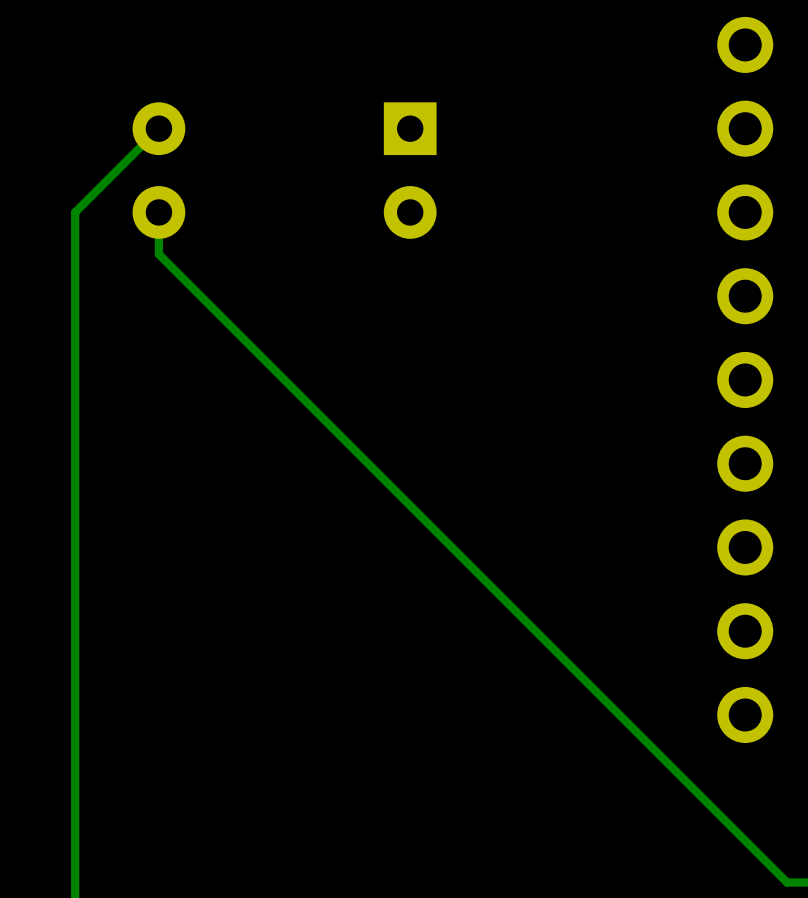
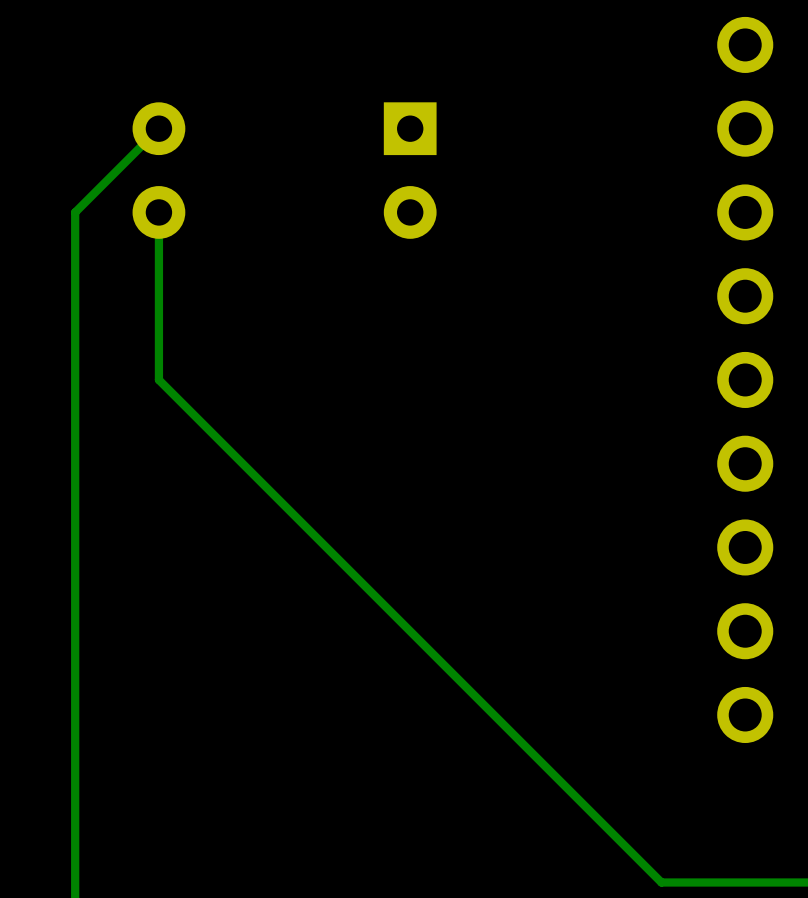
track: (158, 254) (787, 882) -> (158, 254) (158, 379) (661, 882) (787, 882)

